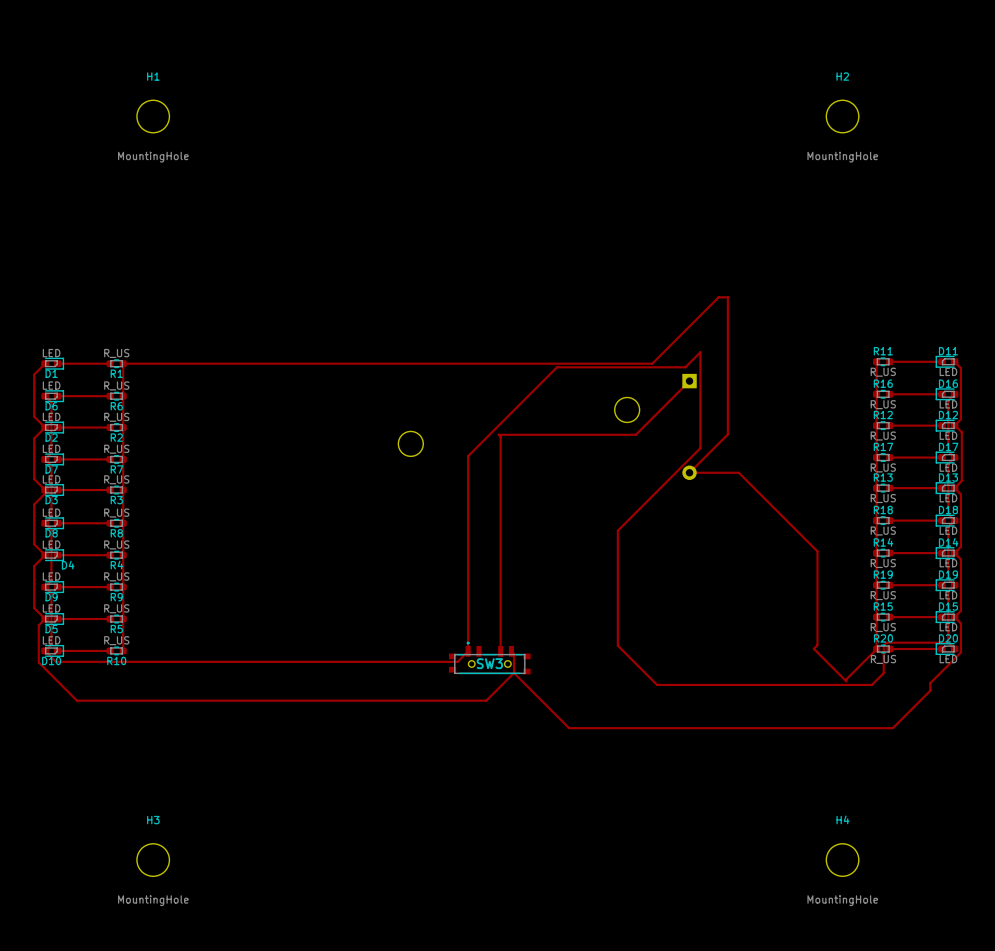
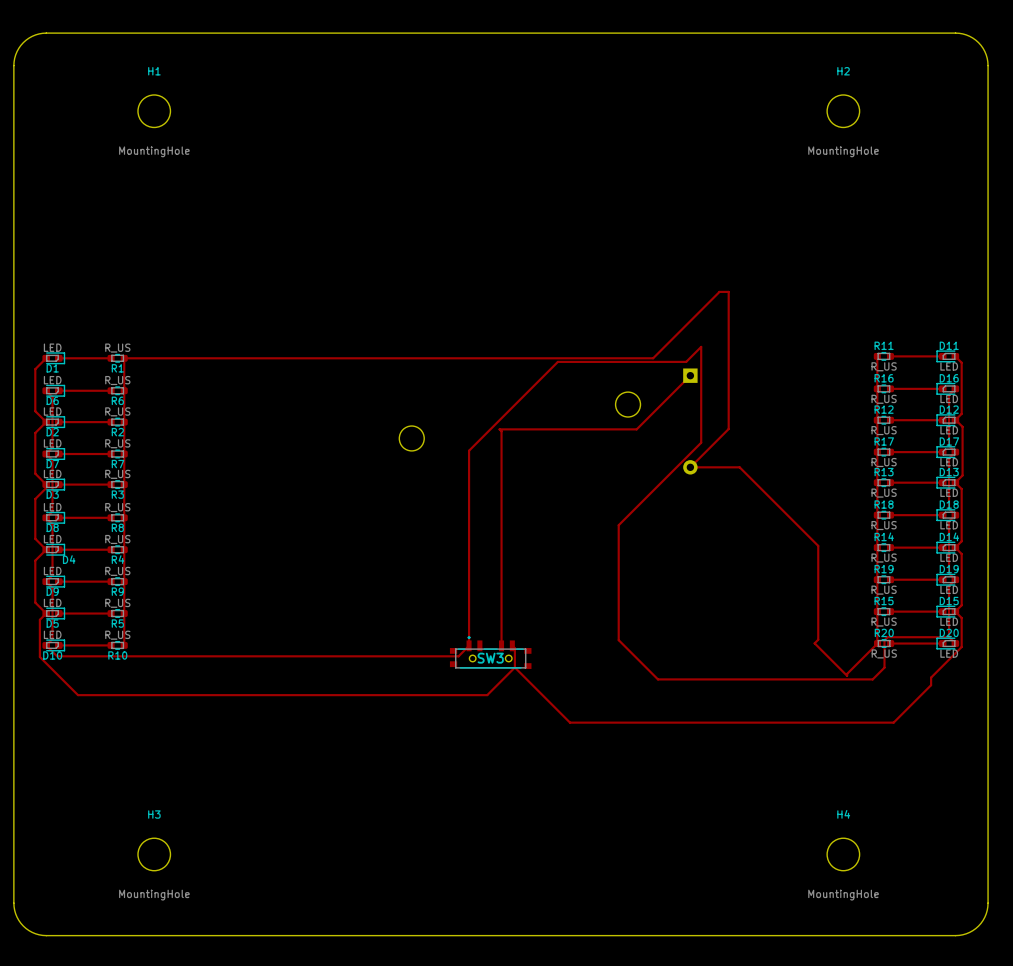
board edge: none -> (46, 33) (955, 33) (966, 34) (978, 42) (984, 51) (988, 65) (988, 903) (984, 917) (978, 926) (969, 932) (955, 935) (46, 935) (32, 932) (23, 926) (15, 913) (13, 903) (13, 65) (15, 54) (23, 42) (35, 34) (46, 33)

